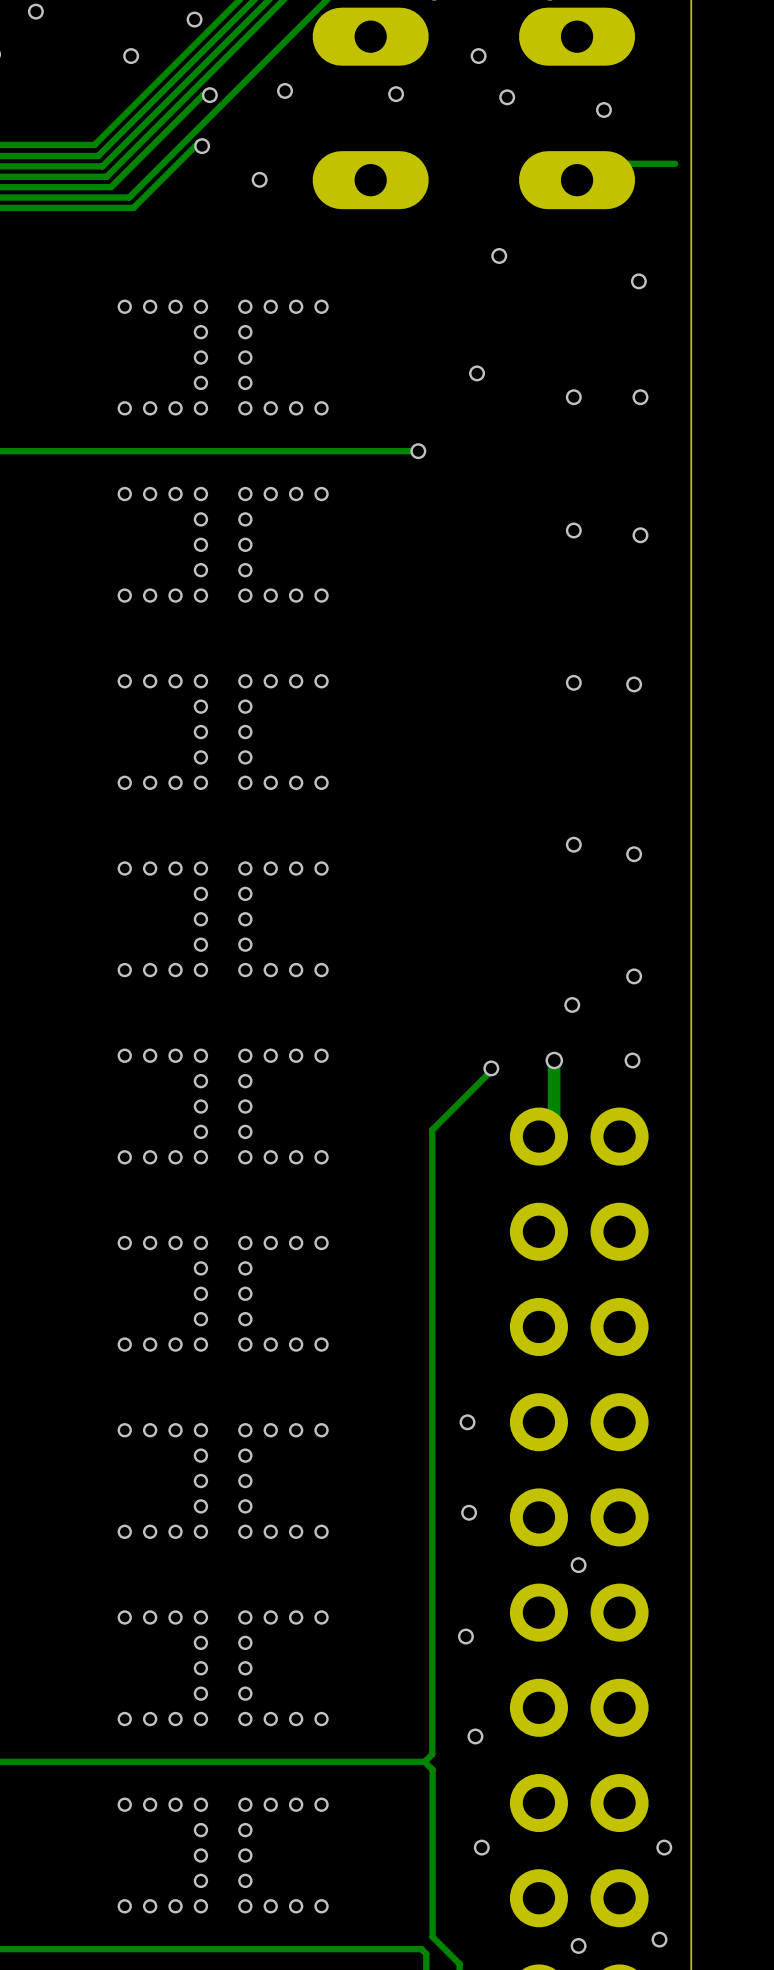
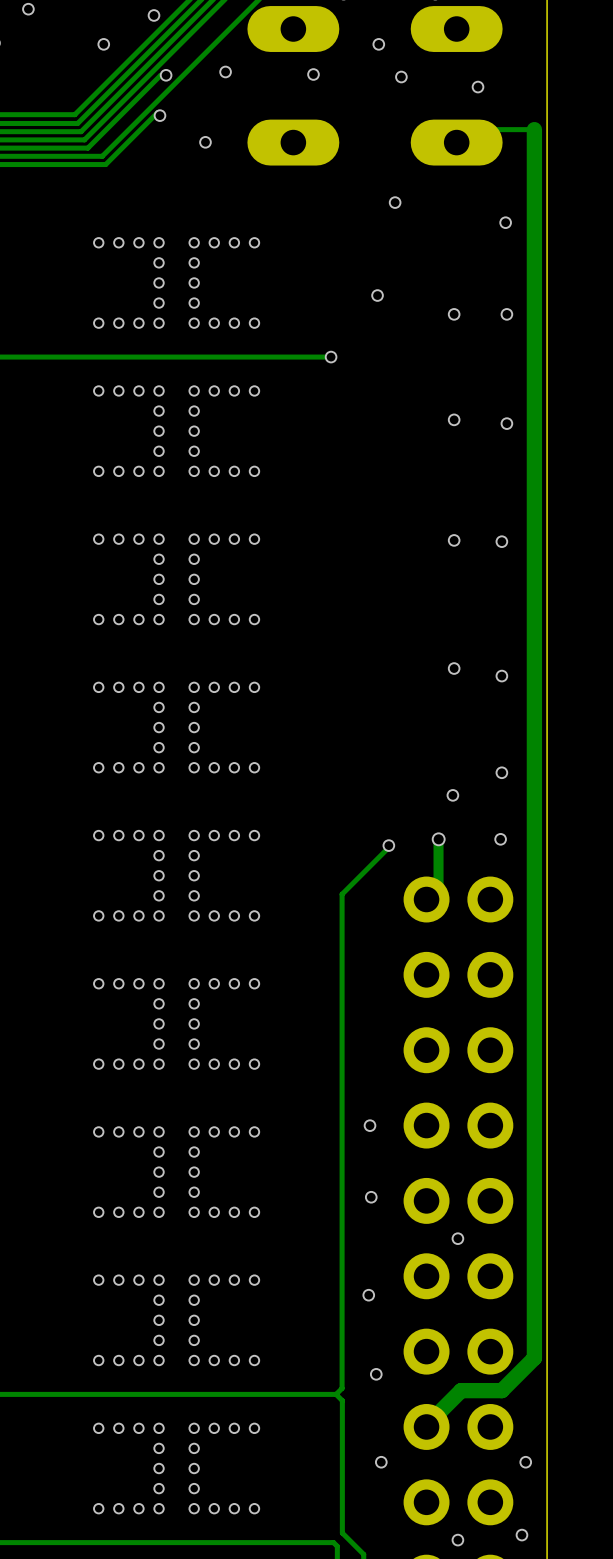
track: none -> (534, 129) (534, 1358) (501, 1390) (461, 1390) (426, 1425)

